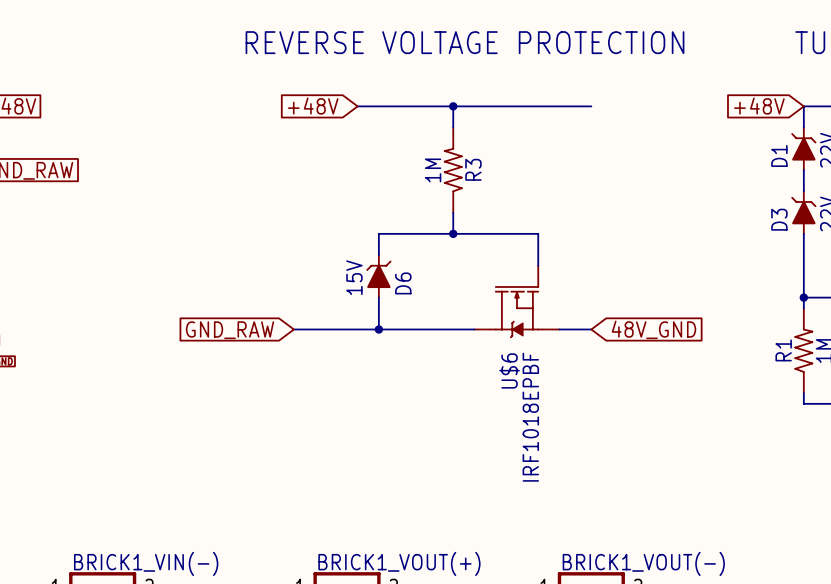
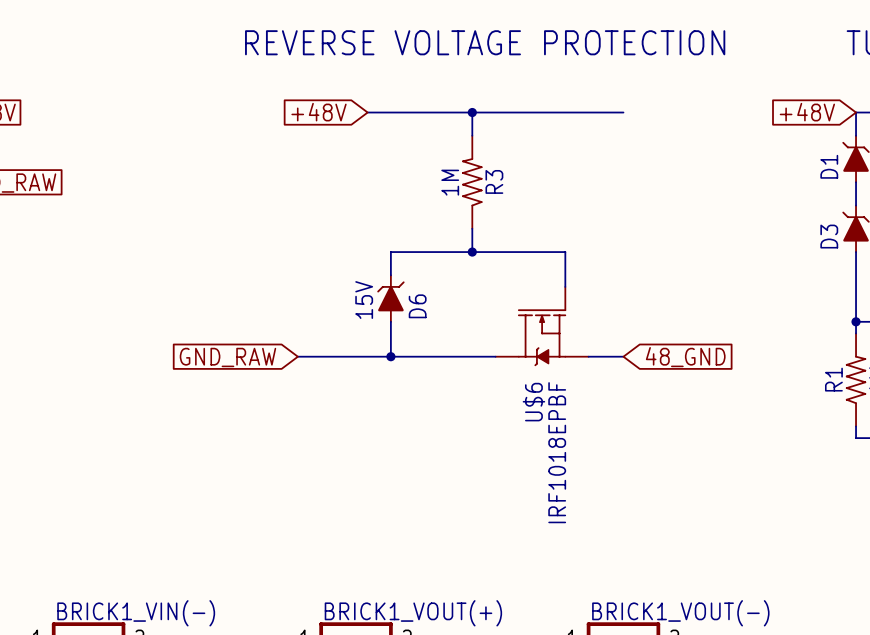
global label: 48V_GND (653, 329) -> 48_GND (685, 357)

